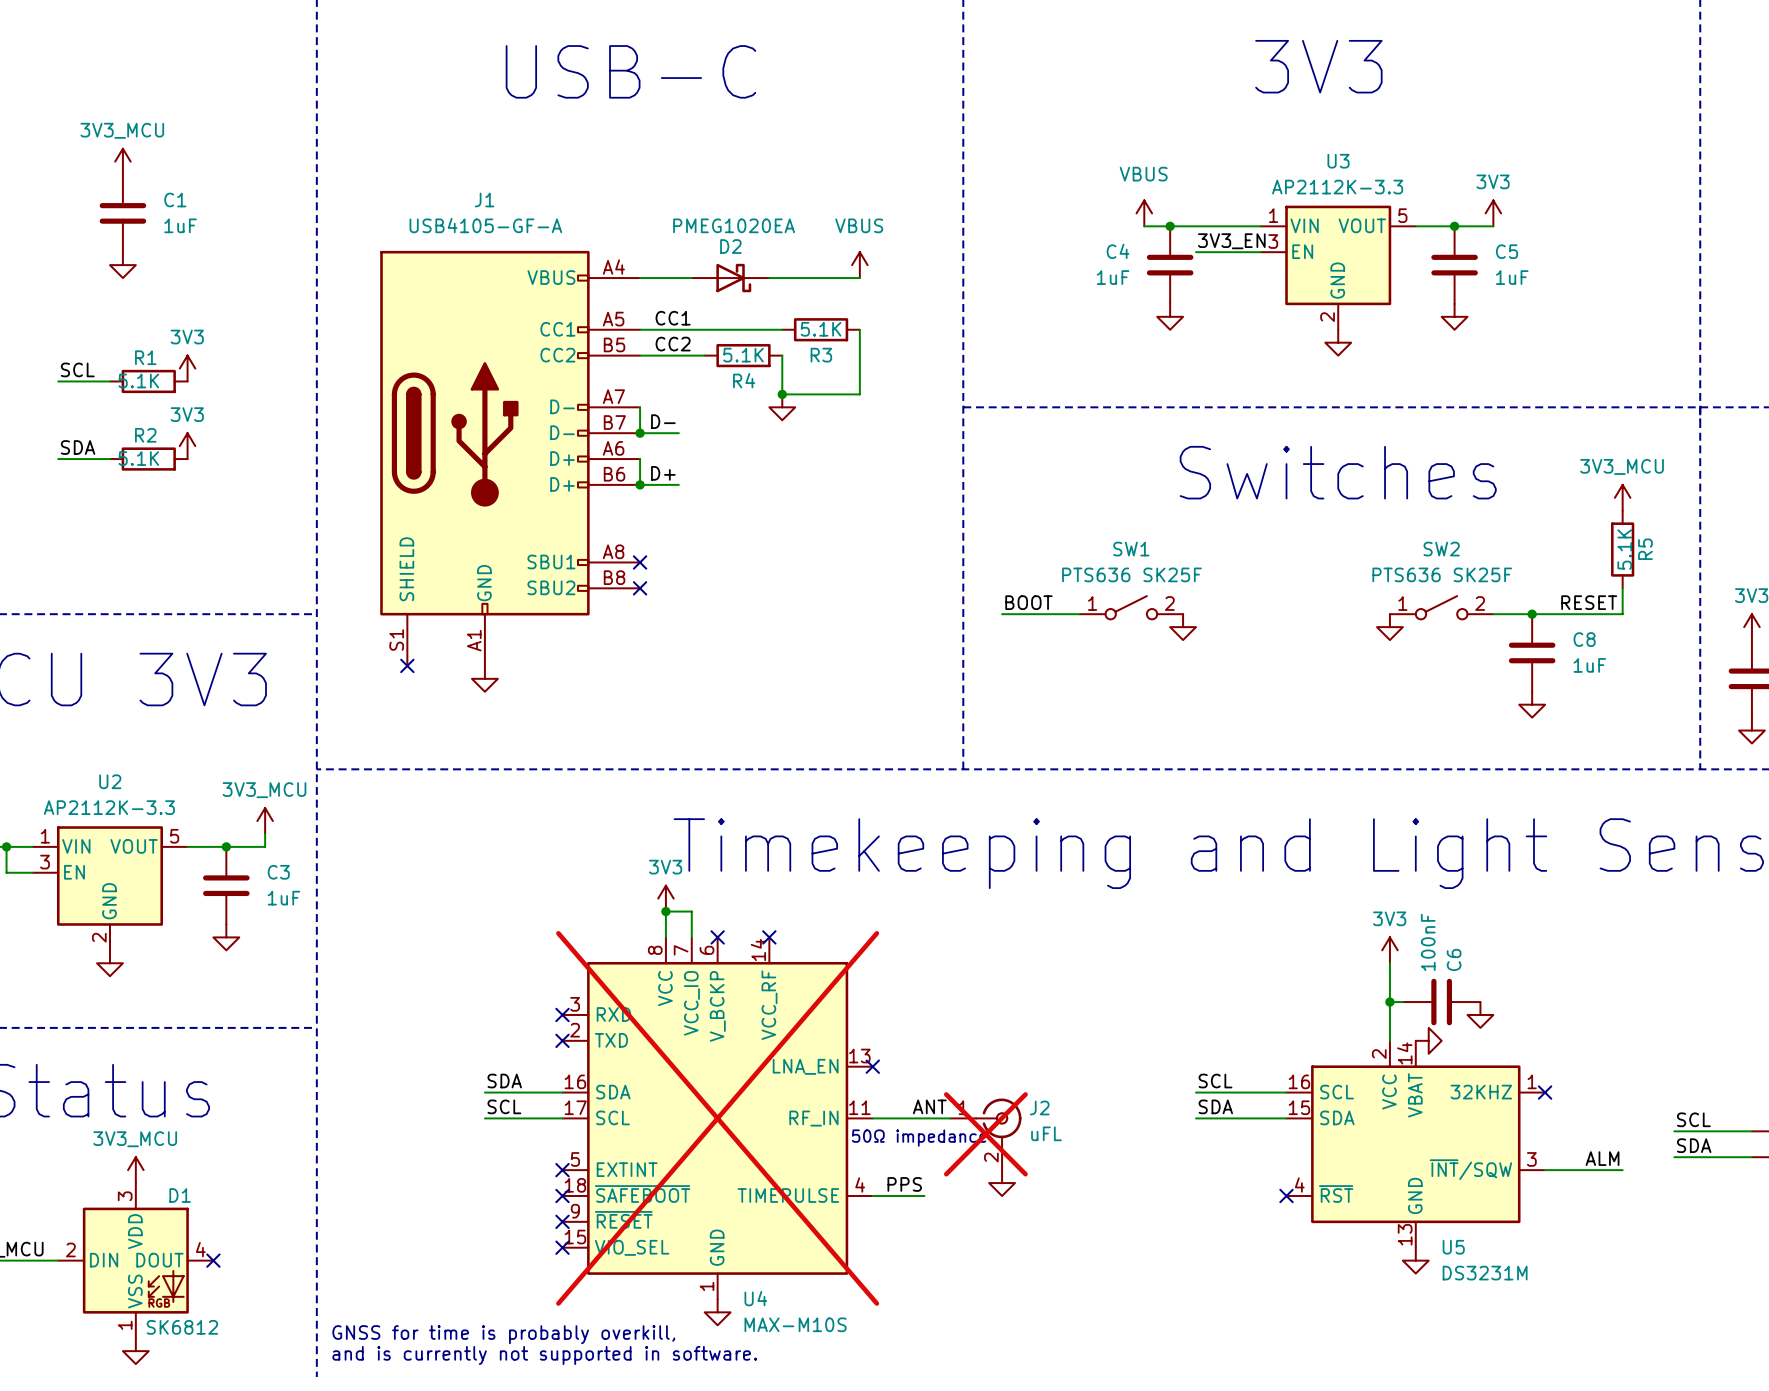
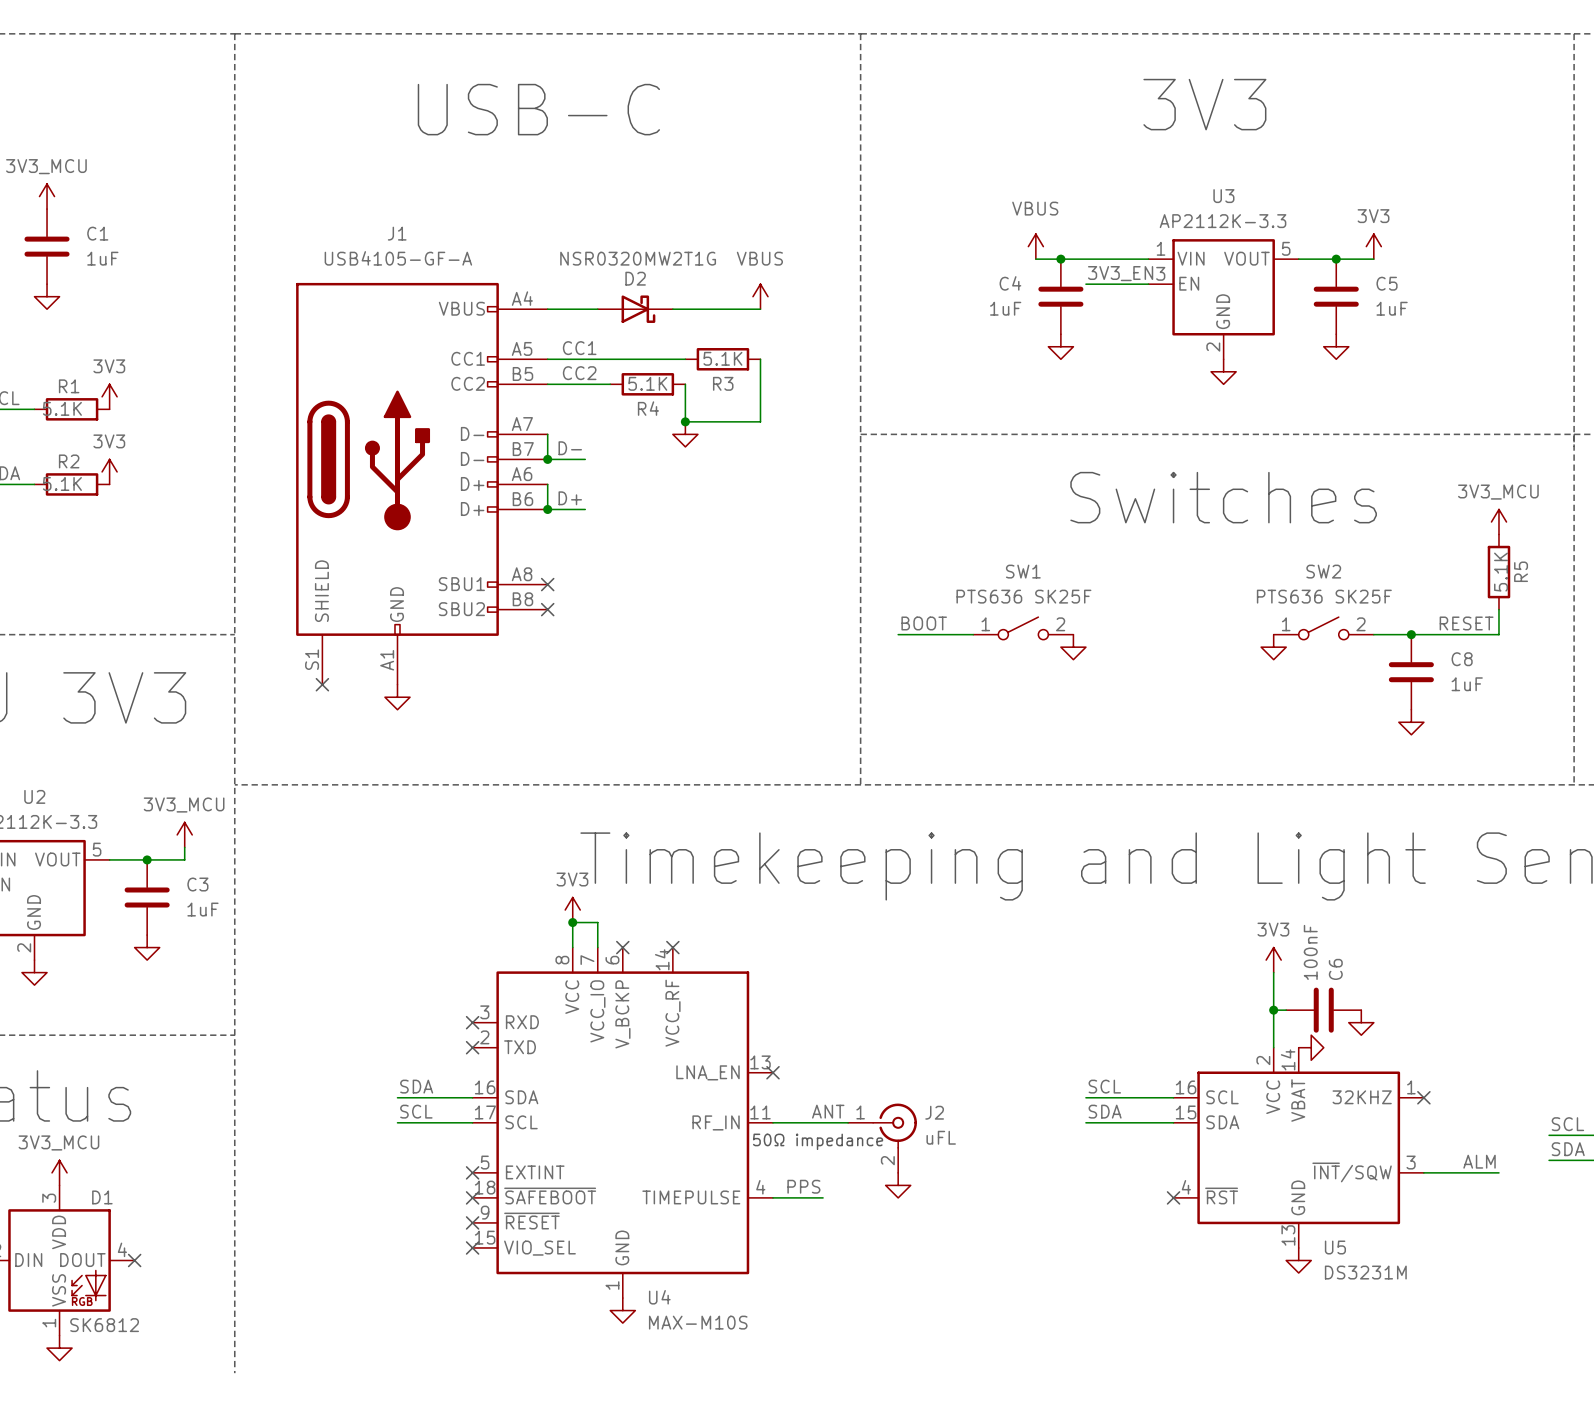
D2 value: PMEG1020EA (734, 225) -> NSR0320MW2T1G (638, 258)
U4 do-not-place cross: (717, 1118) -> none
J2 do-not-place cross: (985, 1134) -> none
text: GNSS for time is probably overkill, (503, 1334) -> none
text: and is currently not supported in software. (544, 1355) -> none

